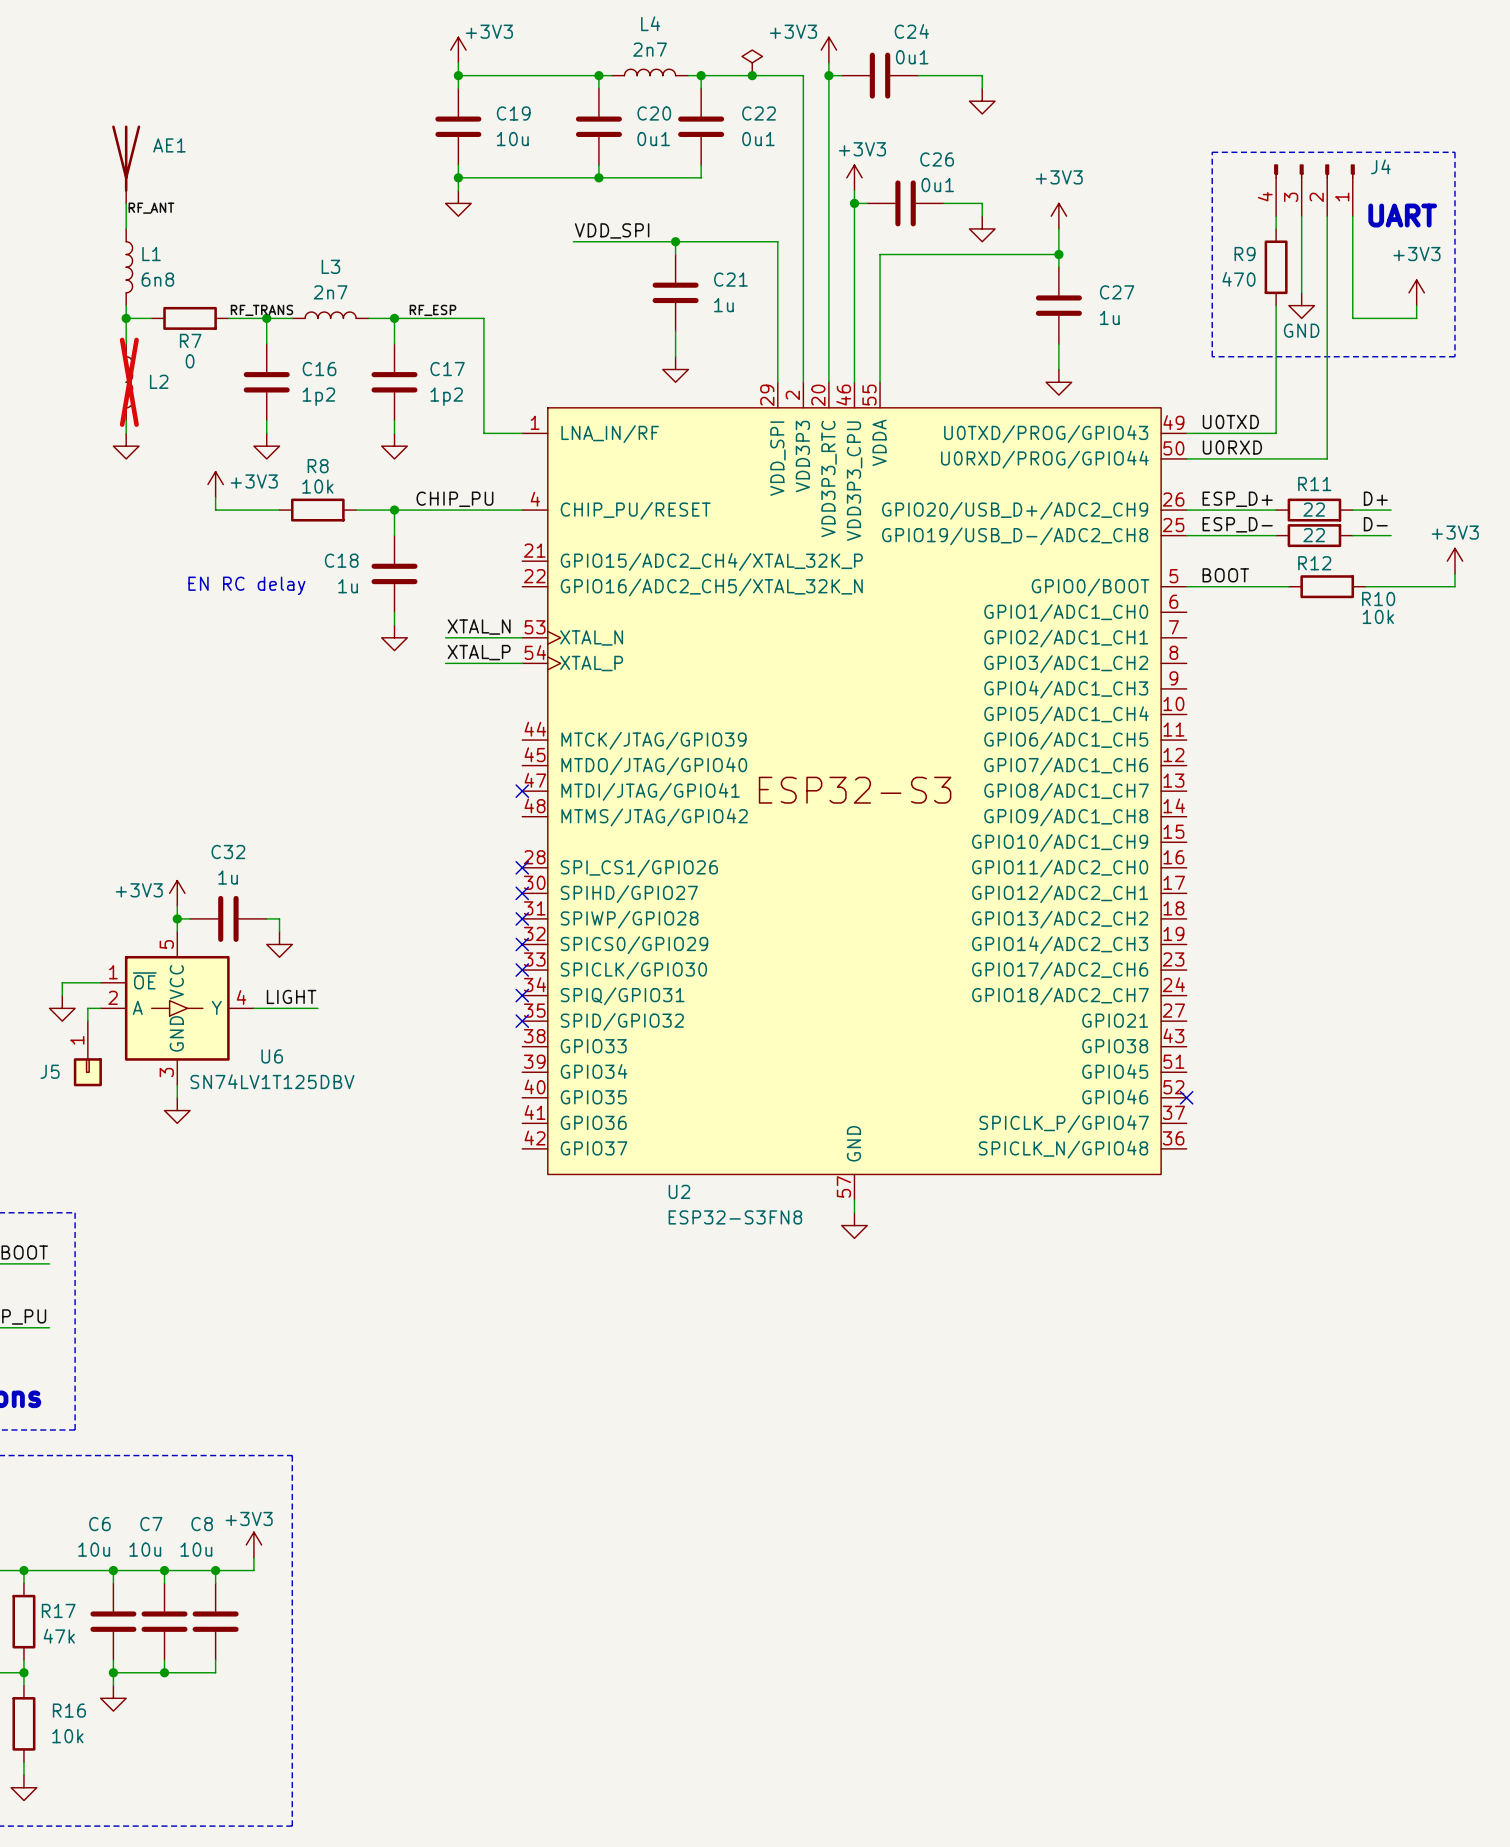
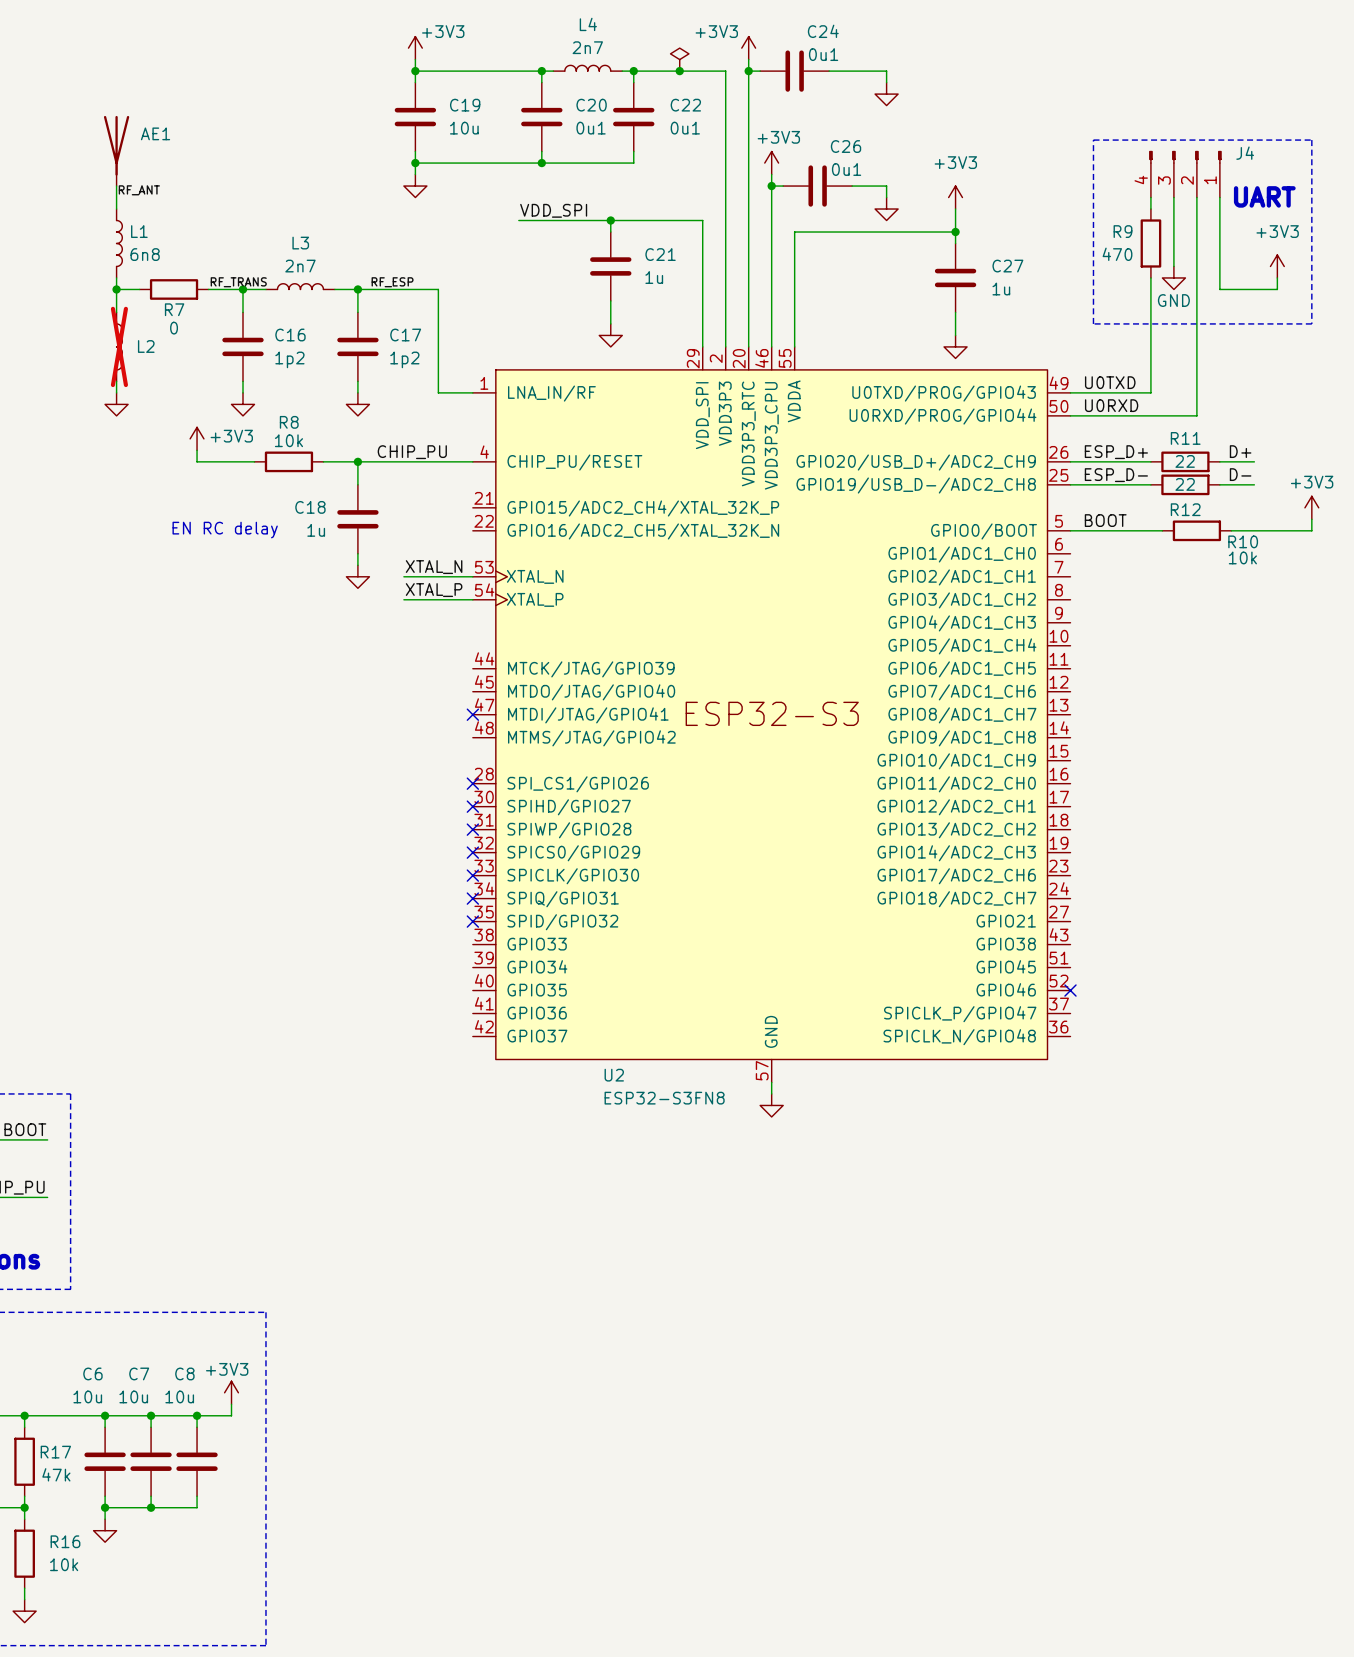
power symbol: +3V3 (177, 893) -> none
wire: (177, 906) (177, 931) -> none
wire: (177, 918) (190, 918) -> none
junction: (177, 918) -> none
C32: 1u (228, 918) -> none
wire: (266, 918) (279, 918) (279, 931) -> none
power symbol: (279, 944) -> none
wire: (100, 982) (62, 982) (62, 995) -> none
label: LIGHT (291, 996) -> none
power symbol: (62, 1008) -> none
wire: (100, 1008) (87, 1008) (87, 1021) -> none
U6: SN74LV1T125DBV (177, 1008) -> none
wire: (253, 1008) (317, 1008) -> none
J5: (87, 1053) -> none
wire: (177, 1085) (177, 1097) -> none
power symbol: (177, 1110) -> none

